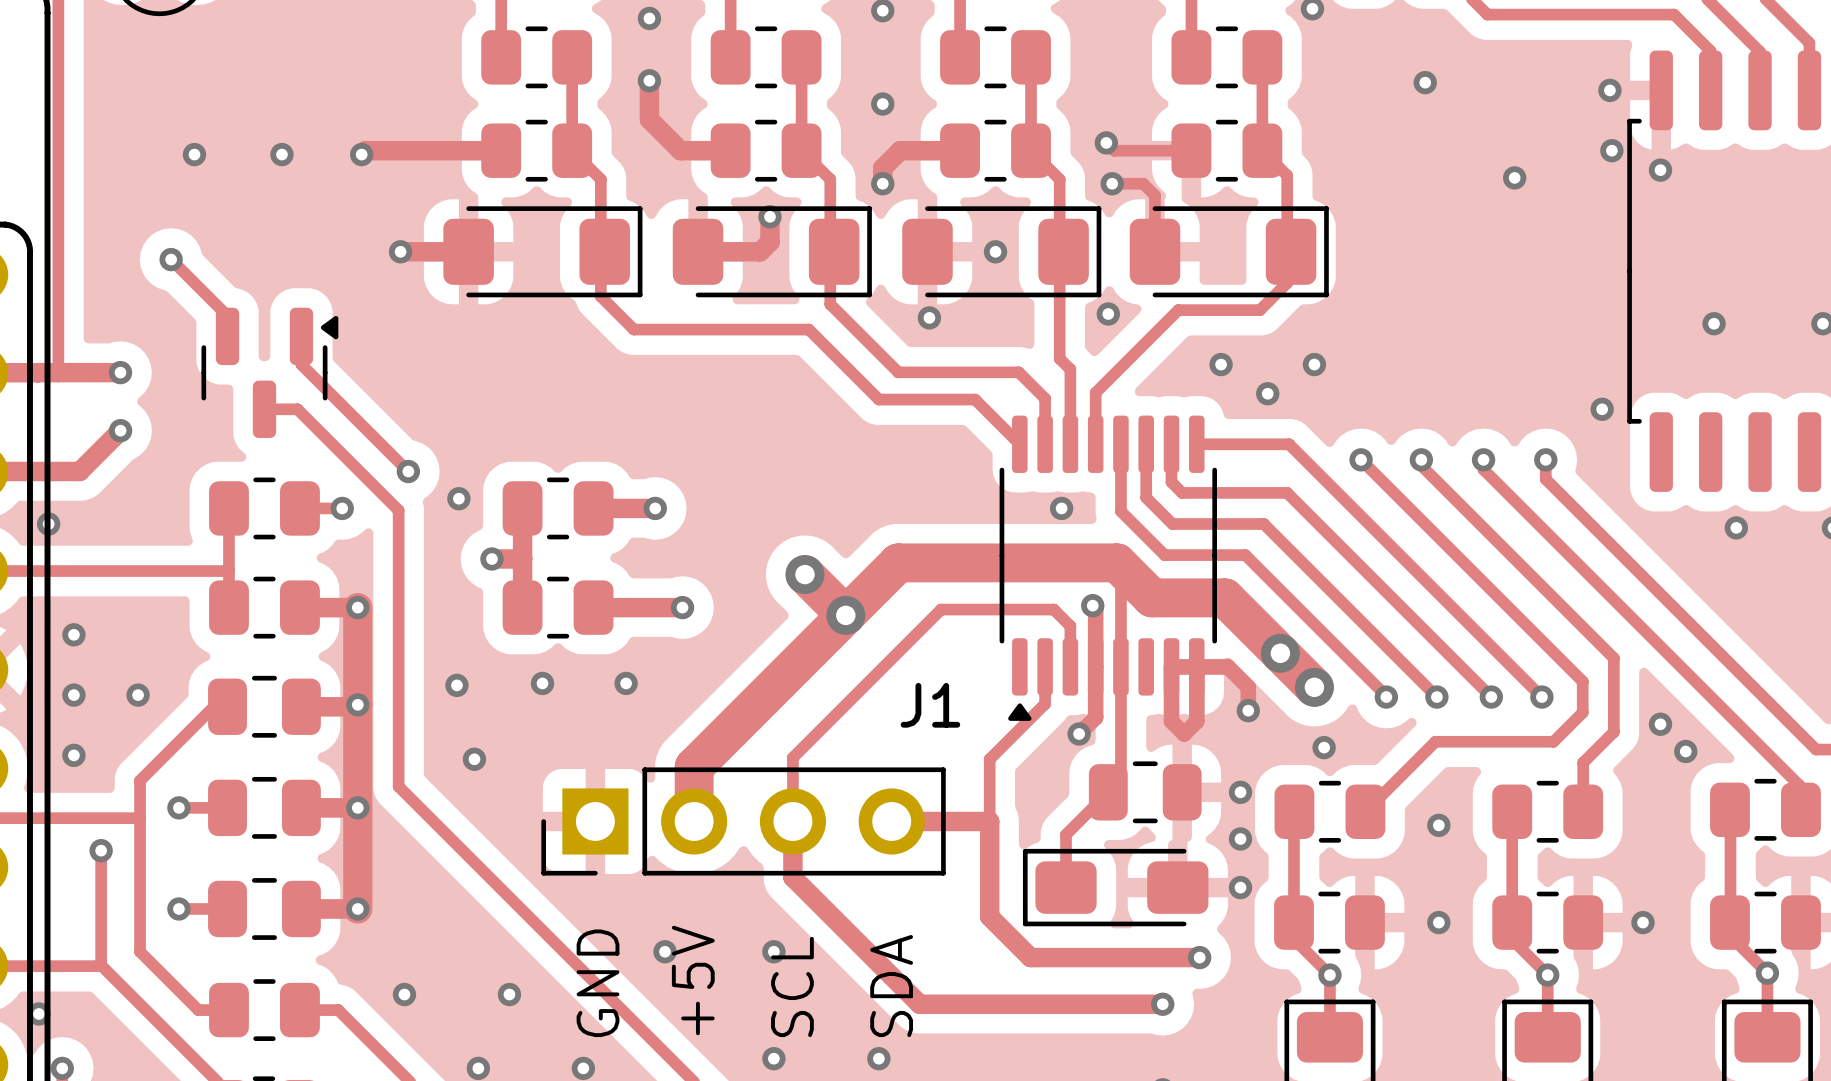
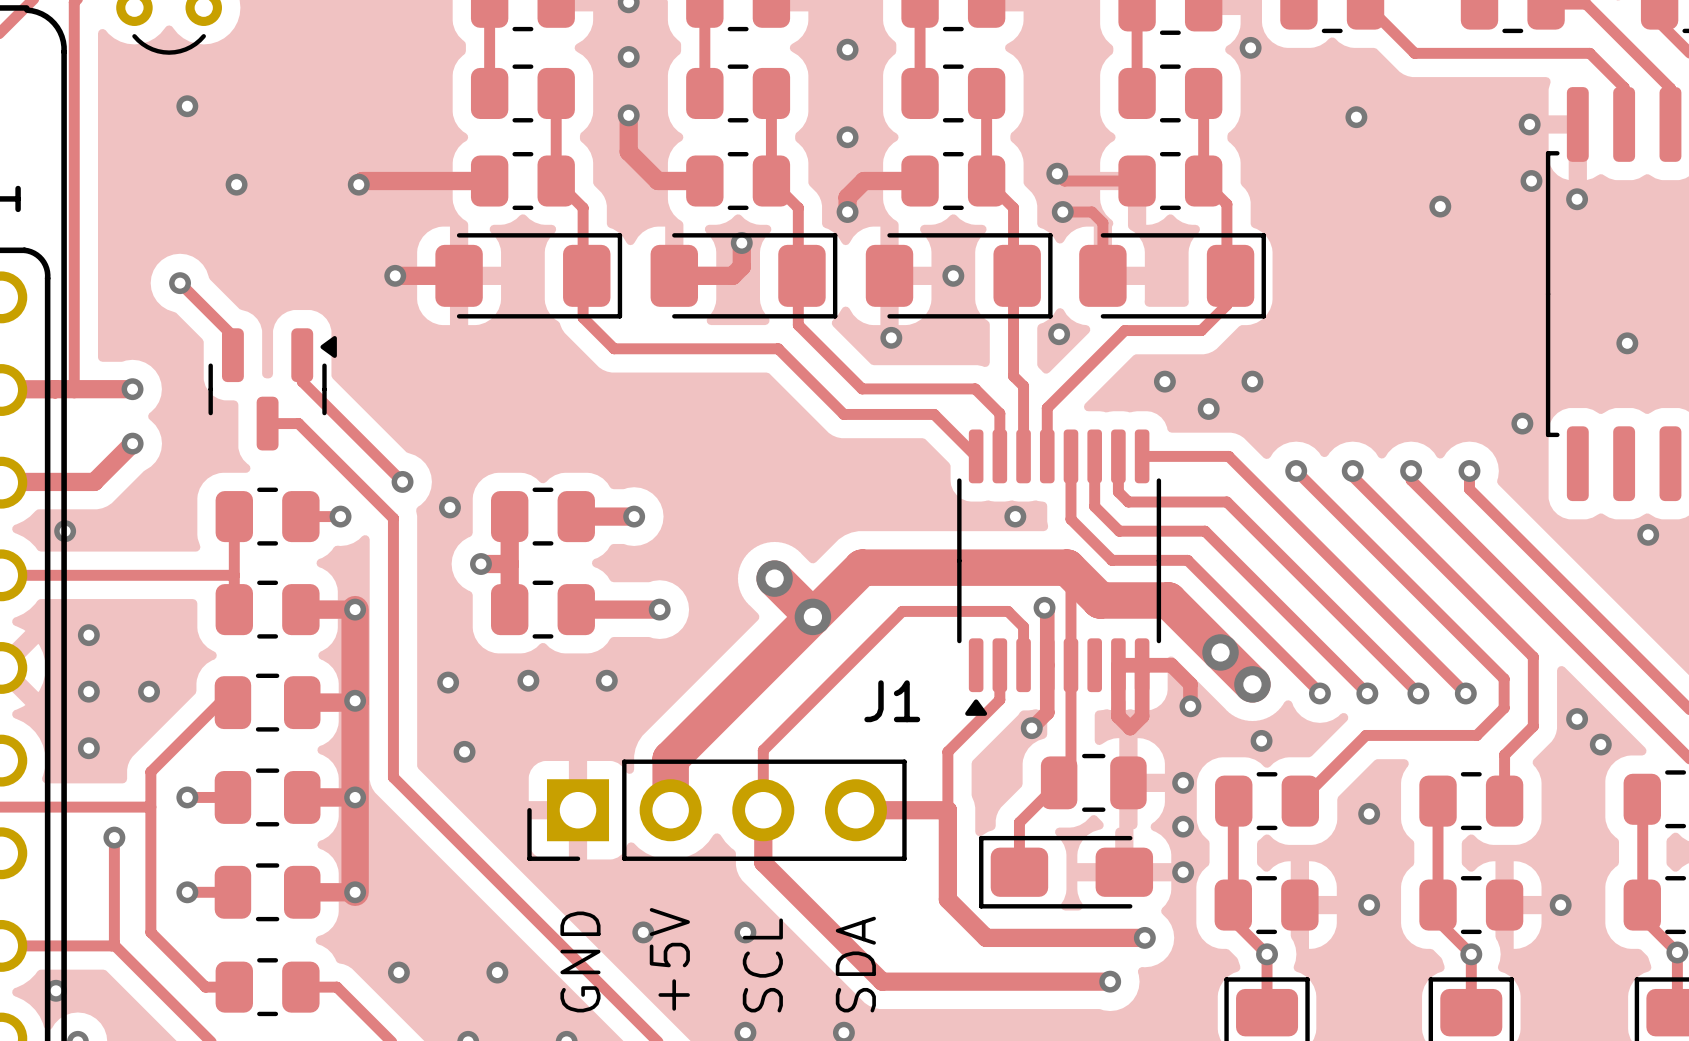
via: none -> (187, 106)
via: (194, 154) -> none
via: none -> (236, 184)
via: (281, 154) -> none

